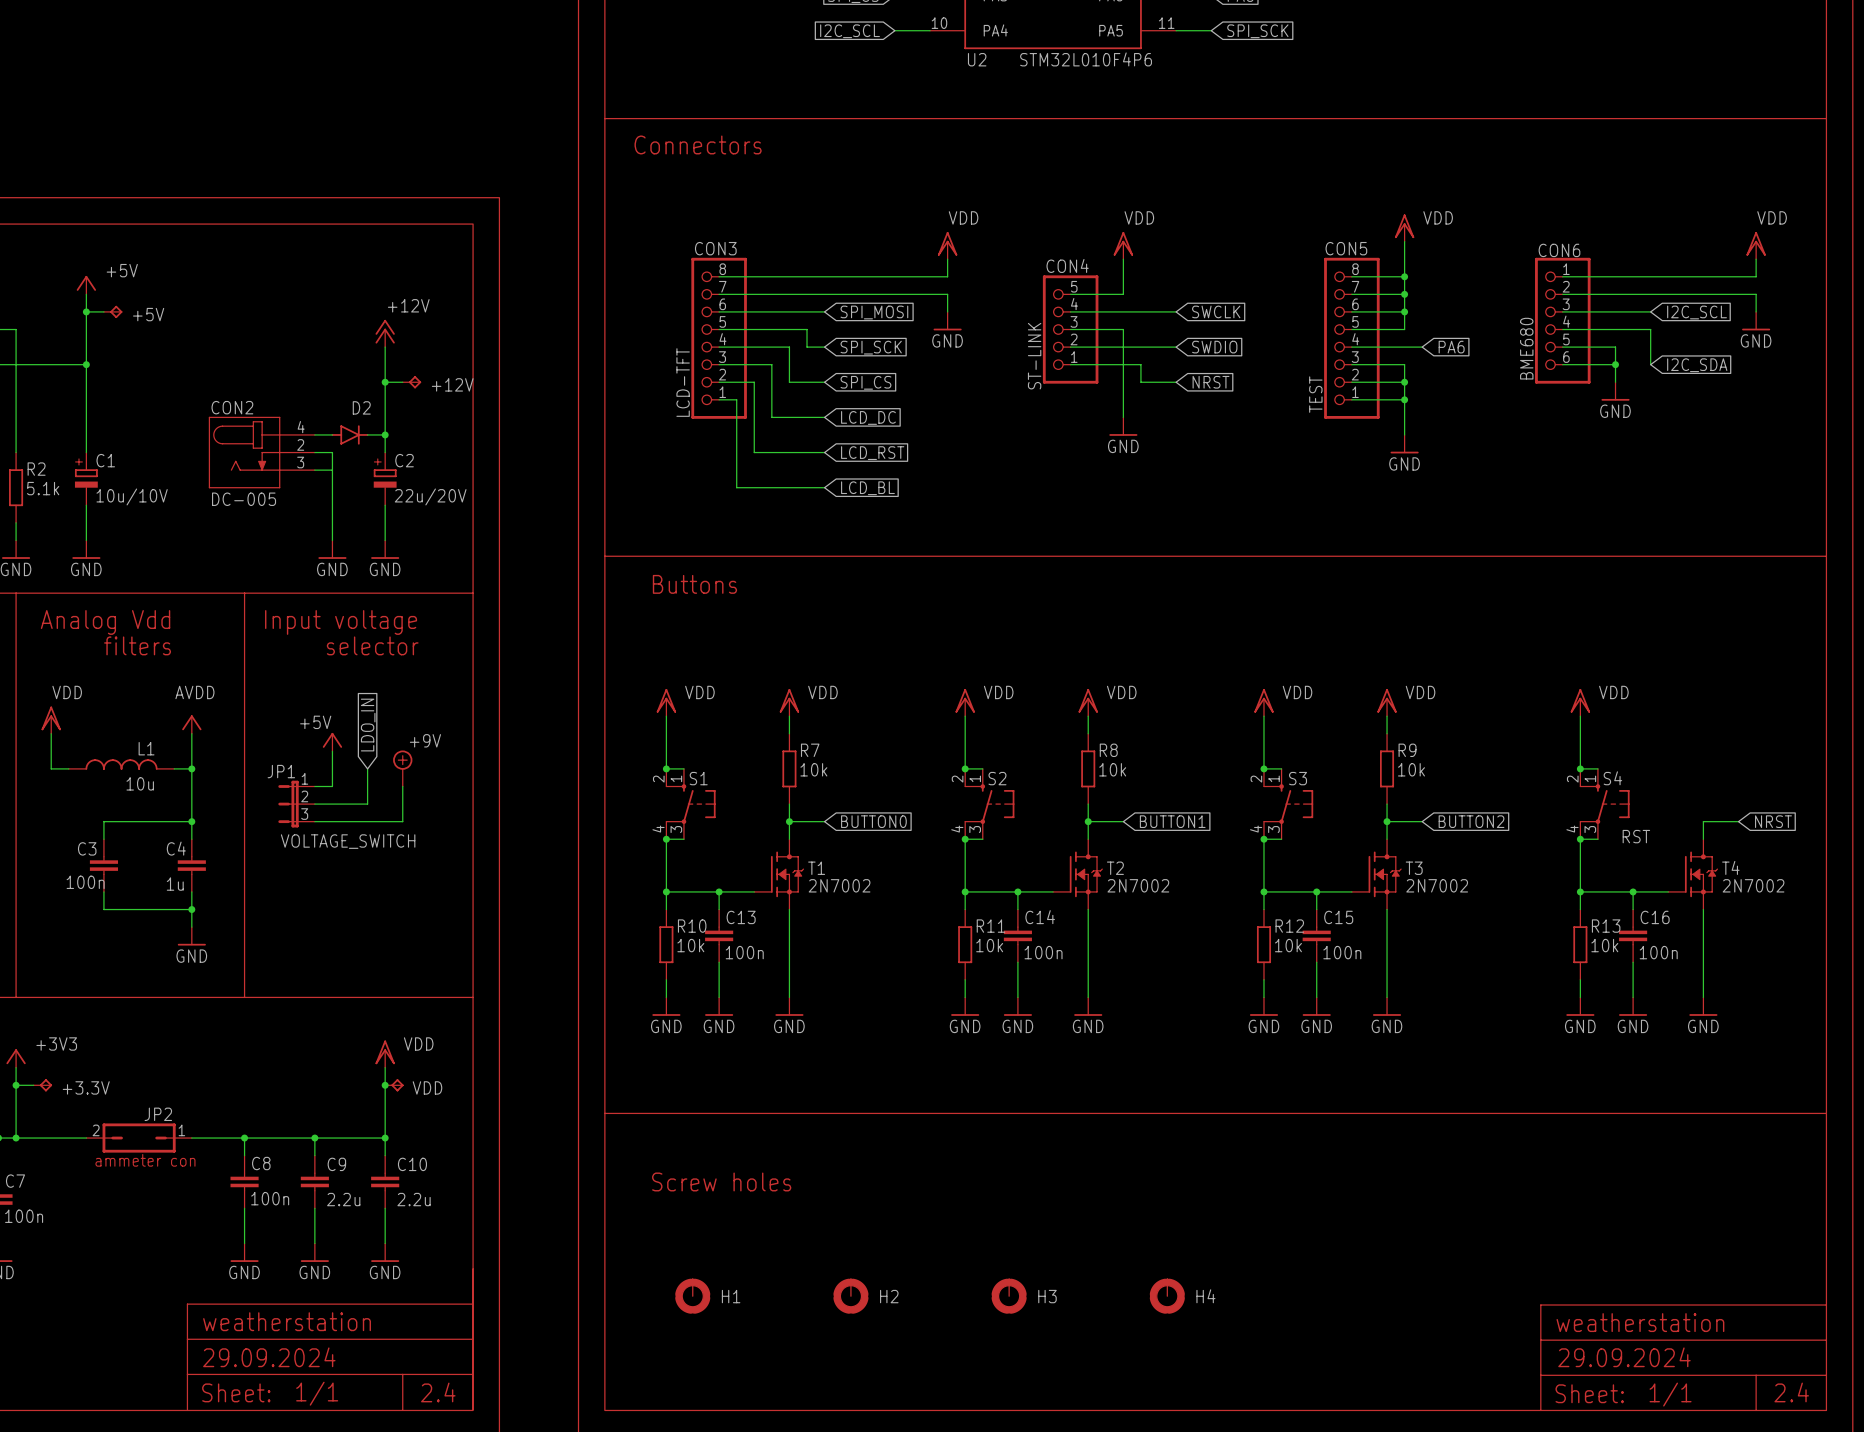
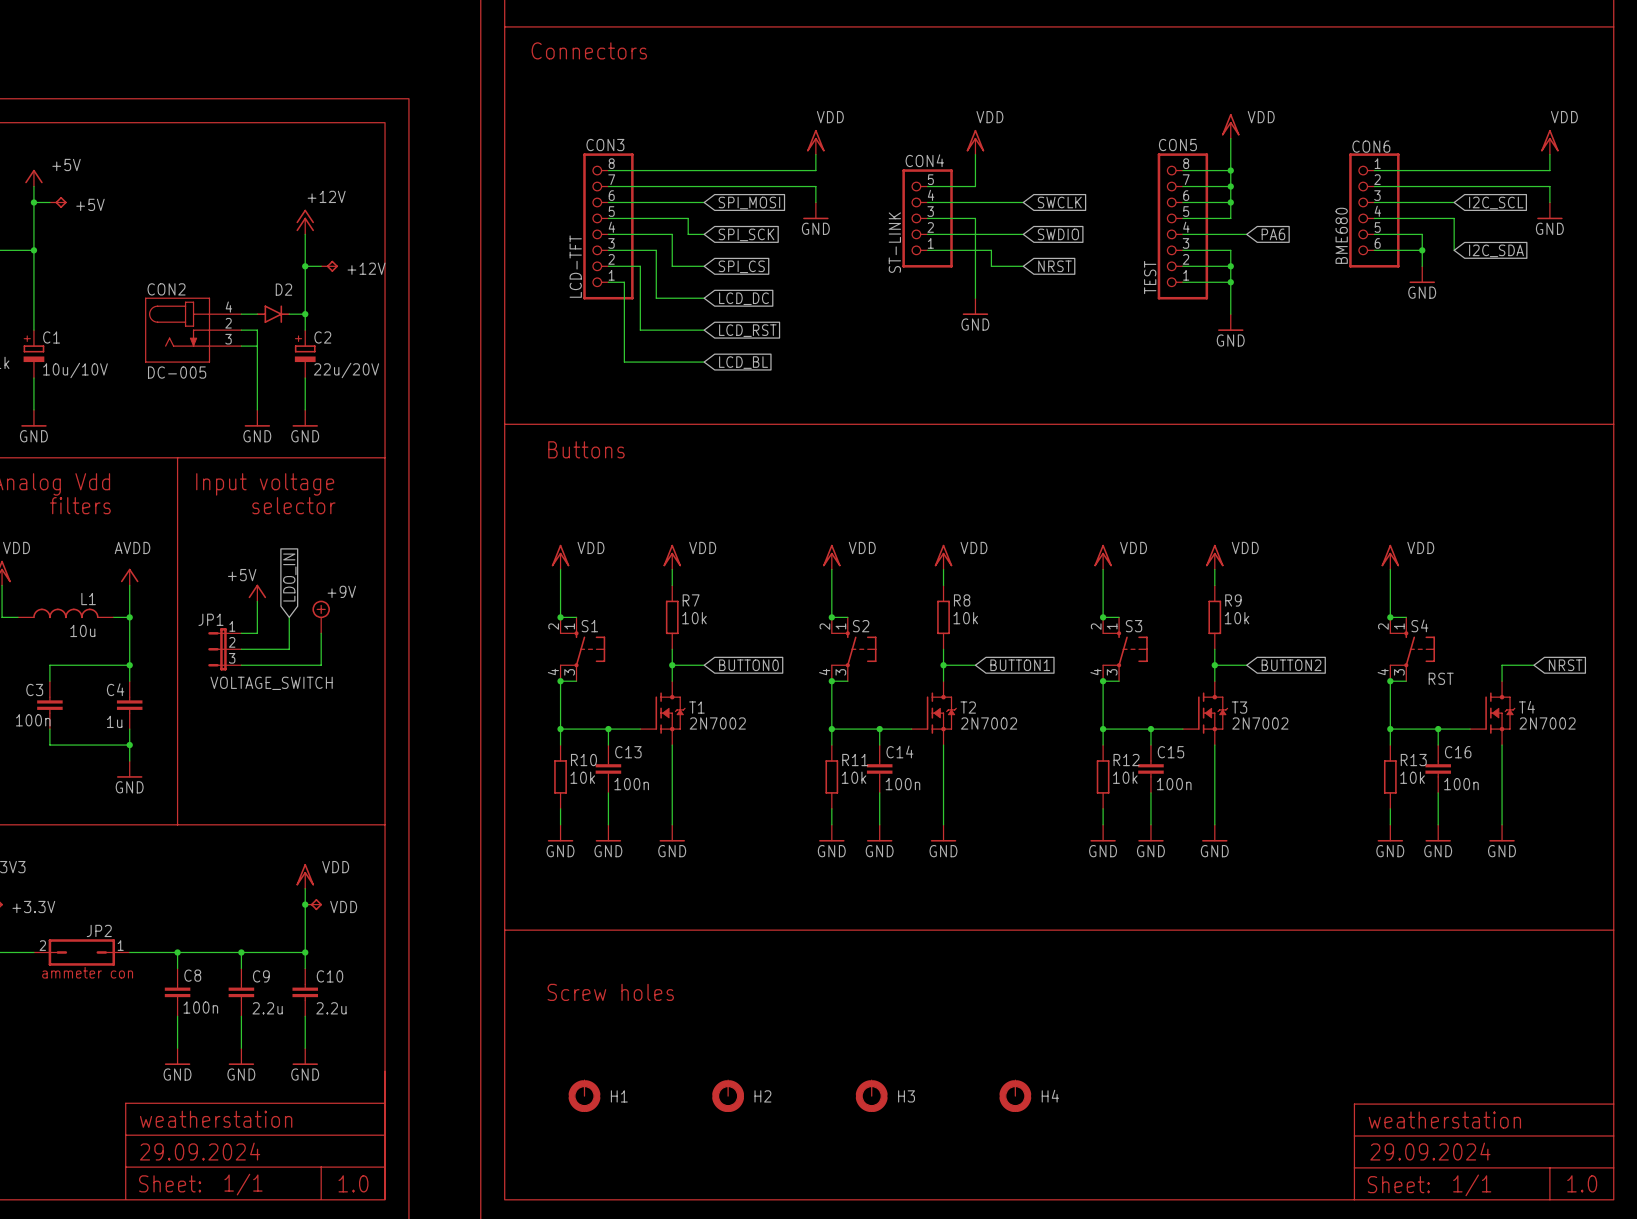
text: 2.4 (438, 1392) -> 1.0 (353, 1183)
text: 2.4 (1791, 1392) -> 1.0 (1582, 1183)

